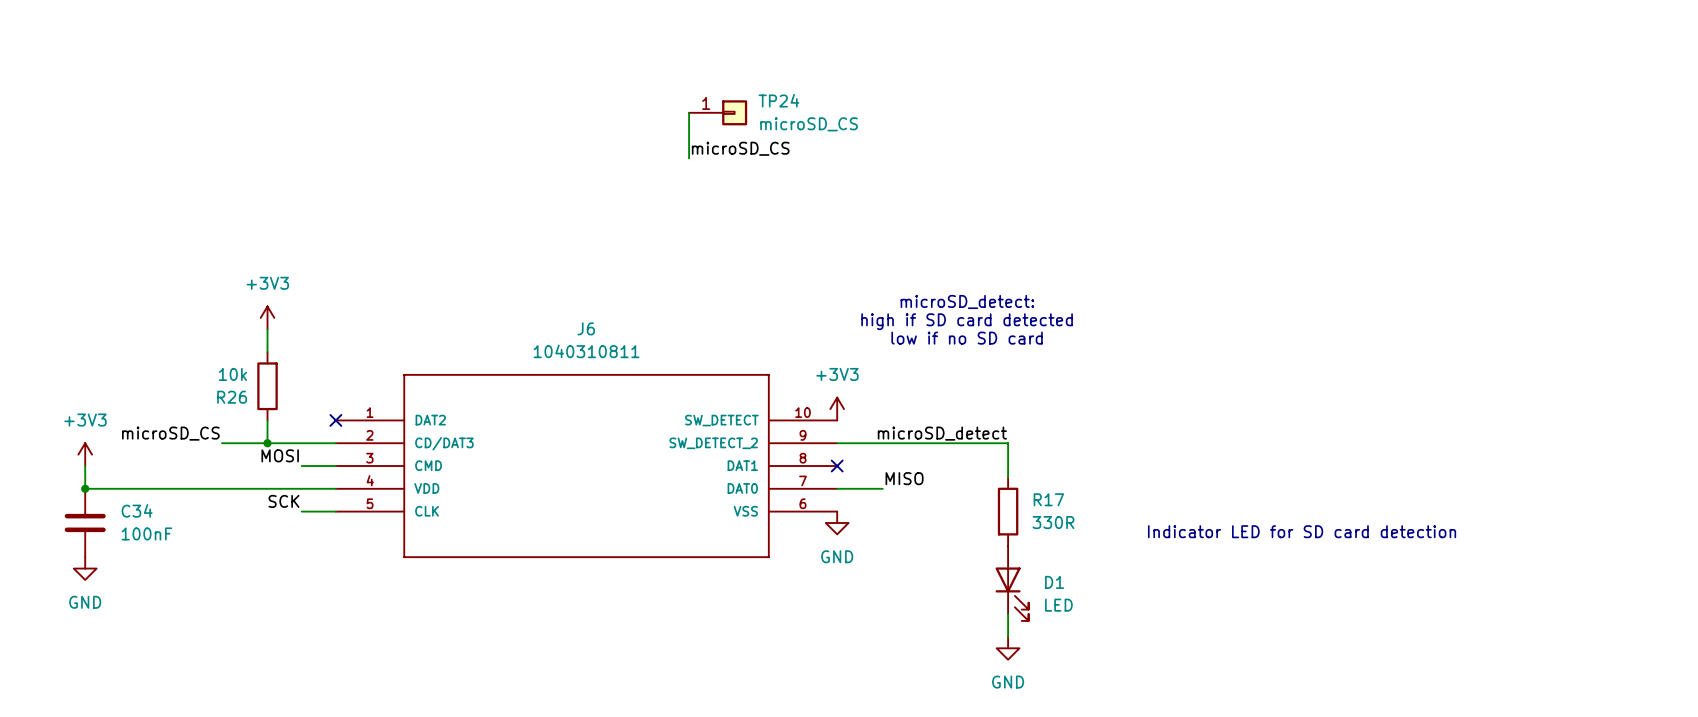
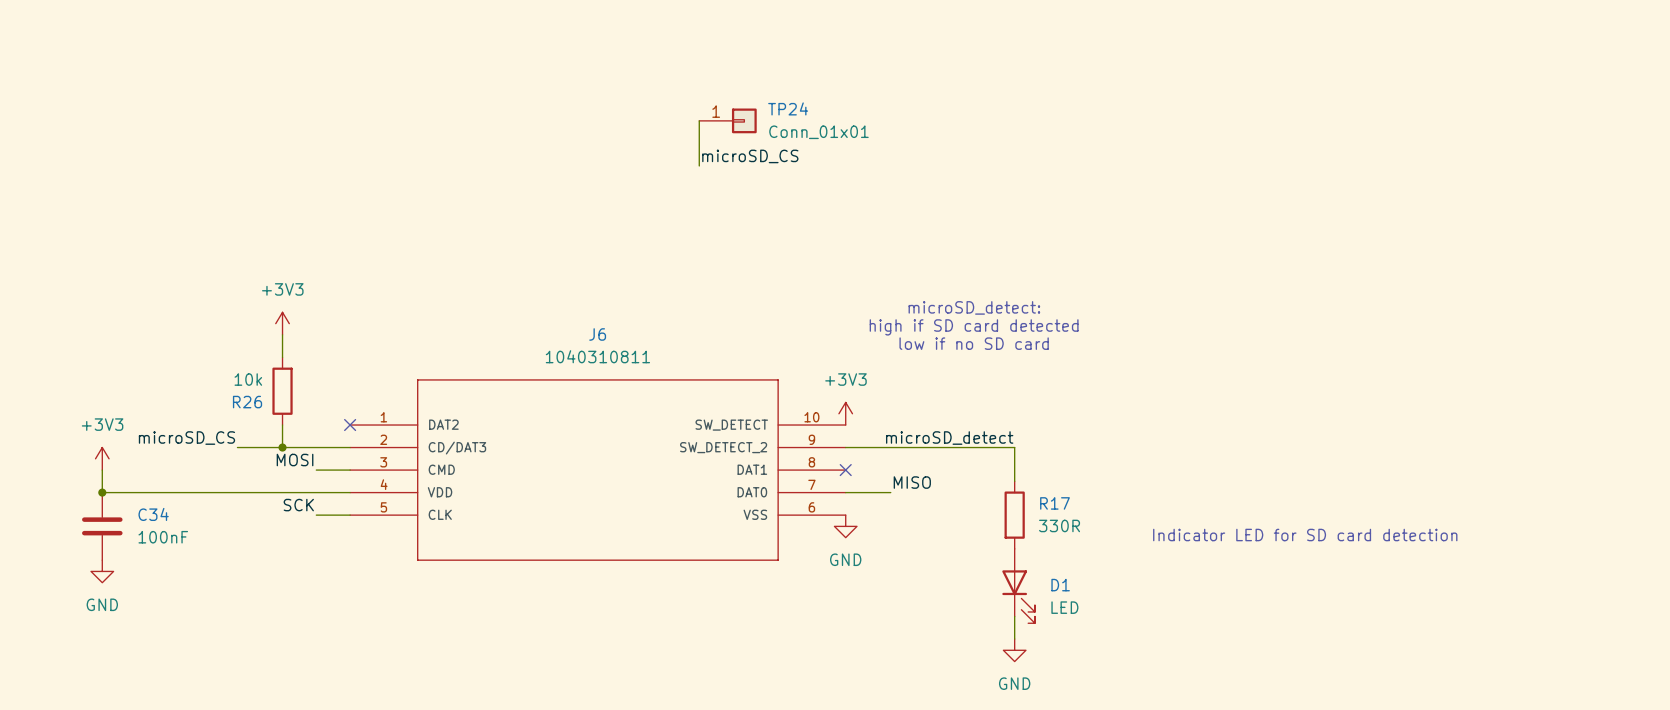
TP24 value: microSD_CS (809, 124) -> Conn_01x01 (818, 132)

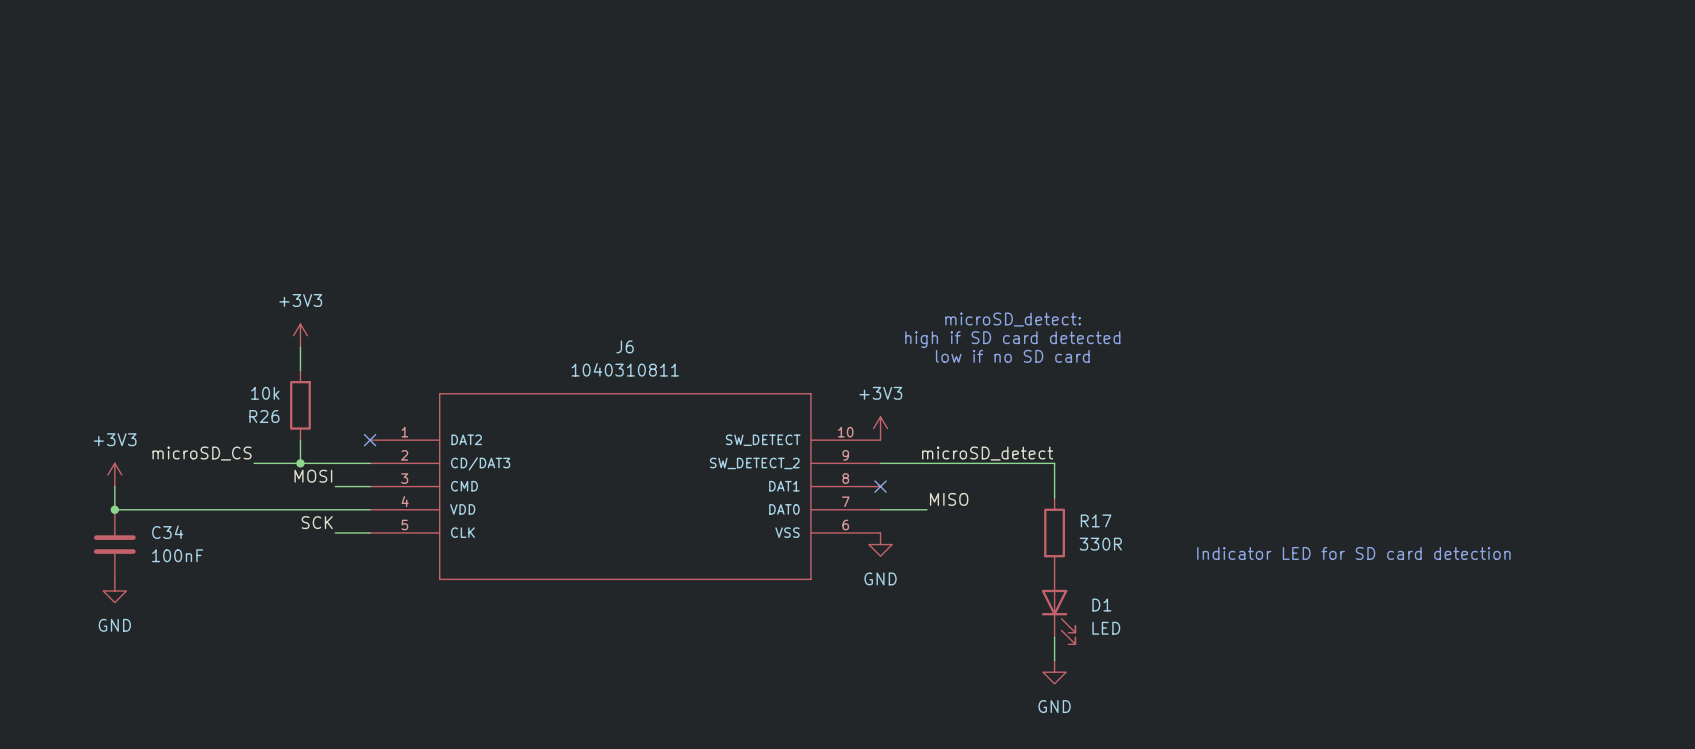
wire: (699, 120) (699, 165) -> none
TP24: Conn_01x01 (728, 120) -> none
label: microSD_CS (750, 156) -> none

